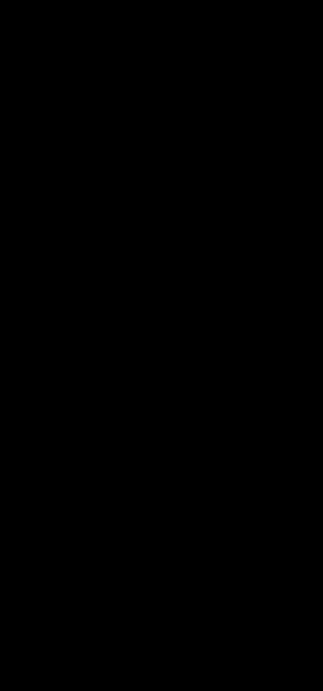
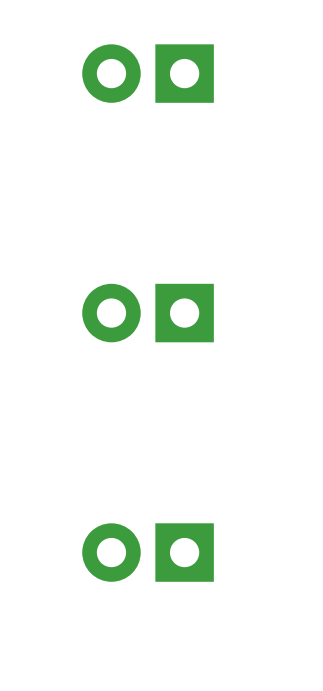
part: none -> (148, 73)
part: none -> (148, 313)
part: none -> (148, 552)

